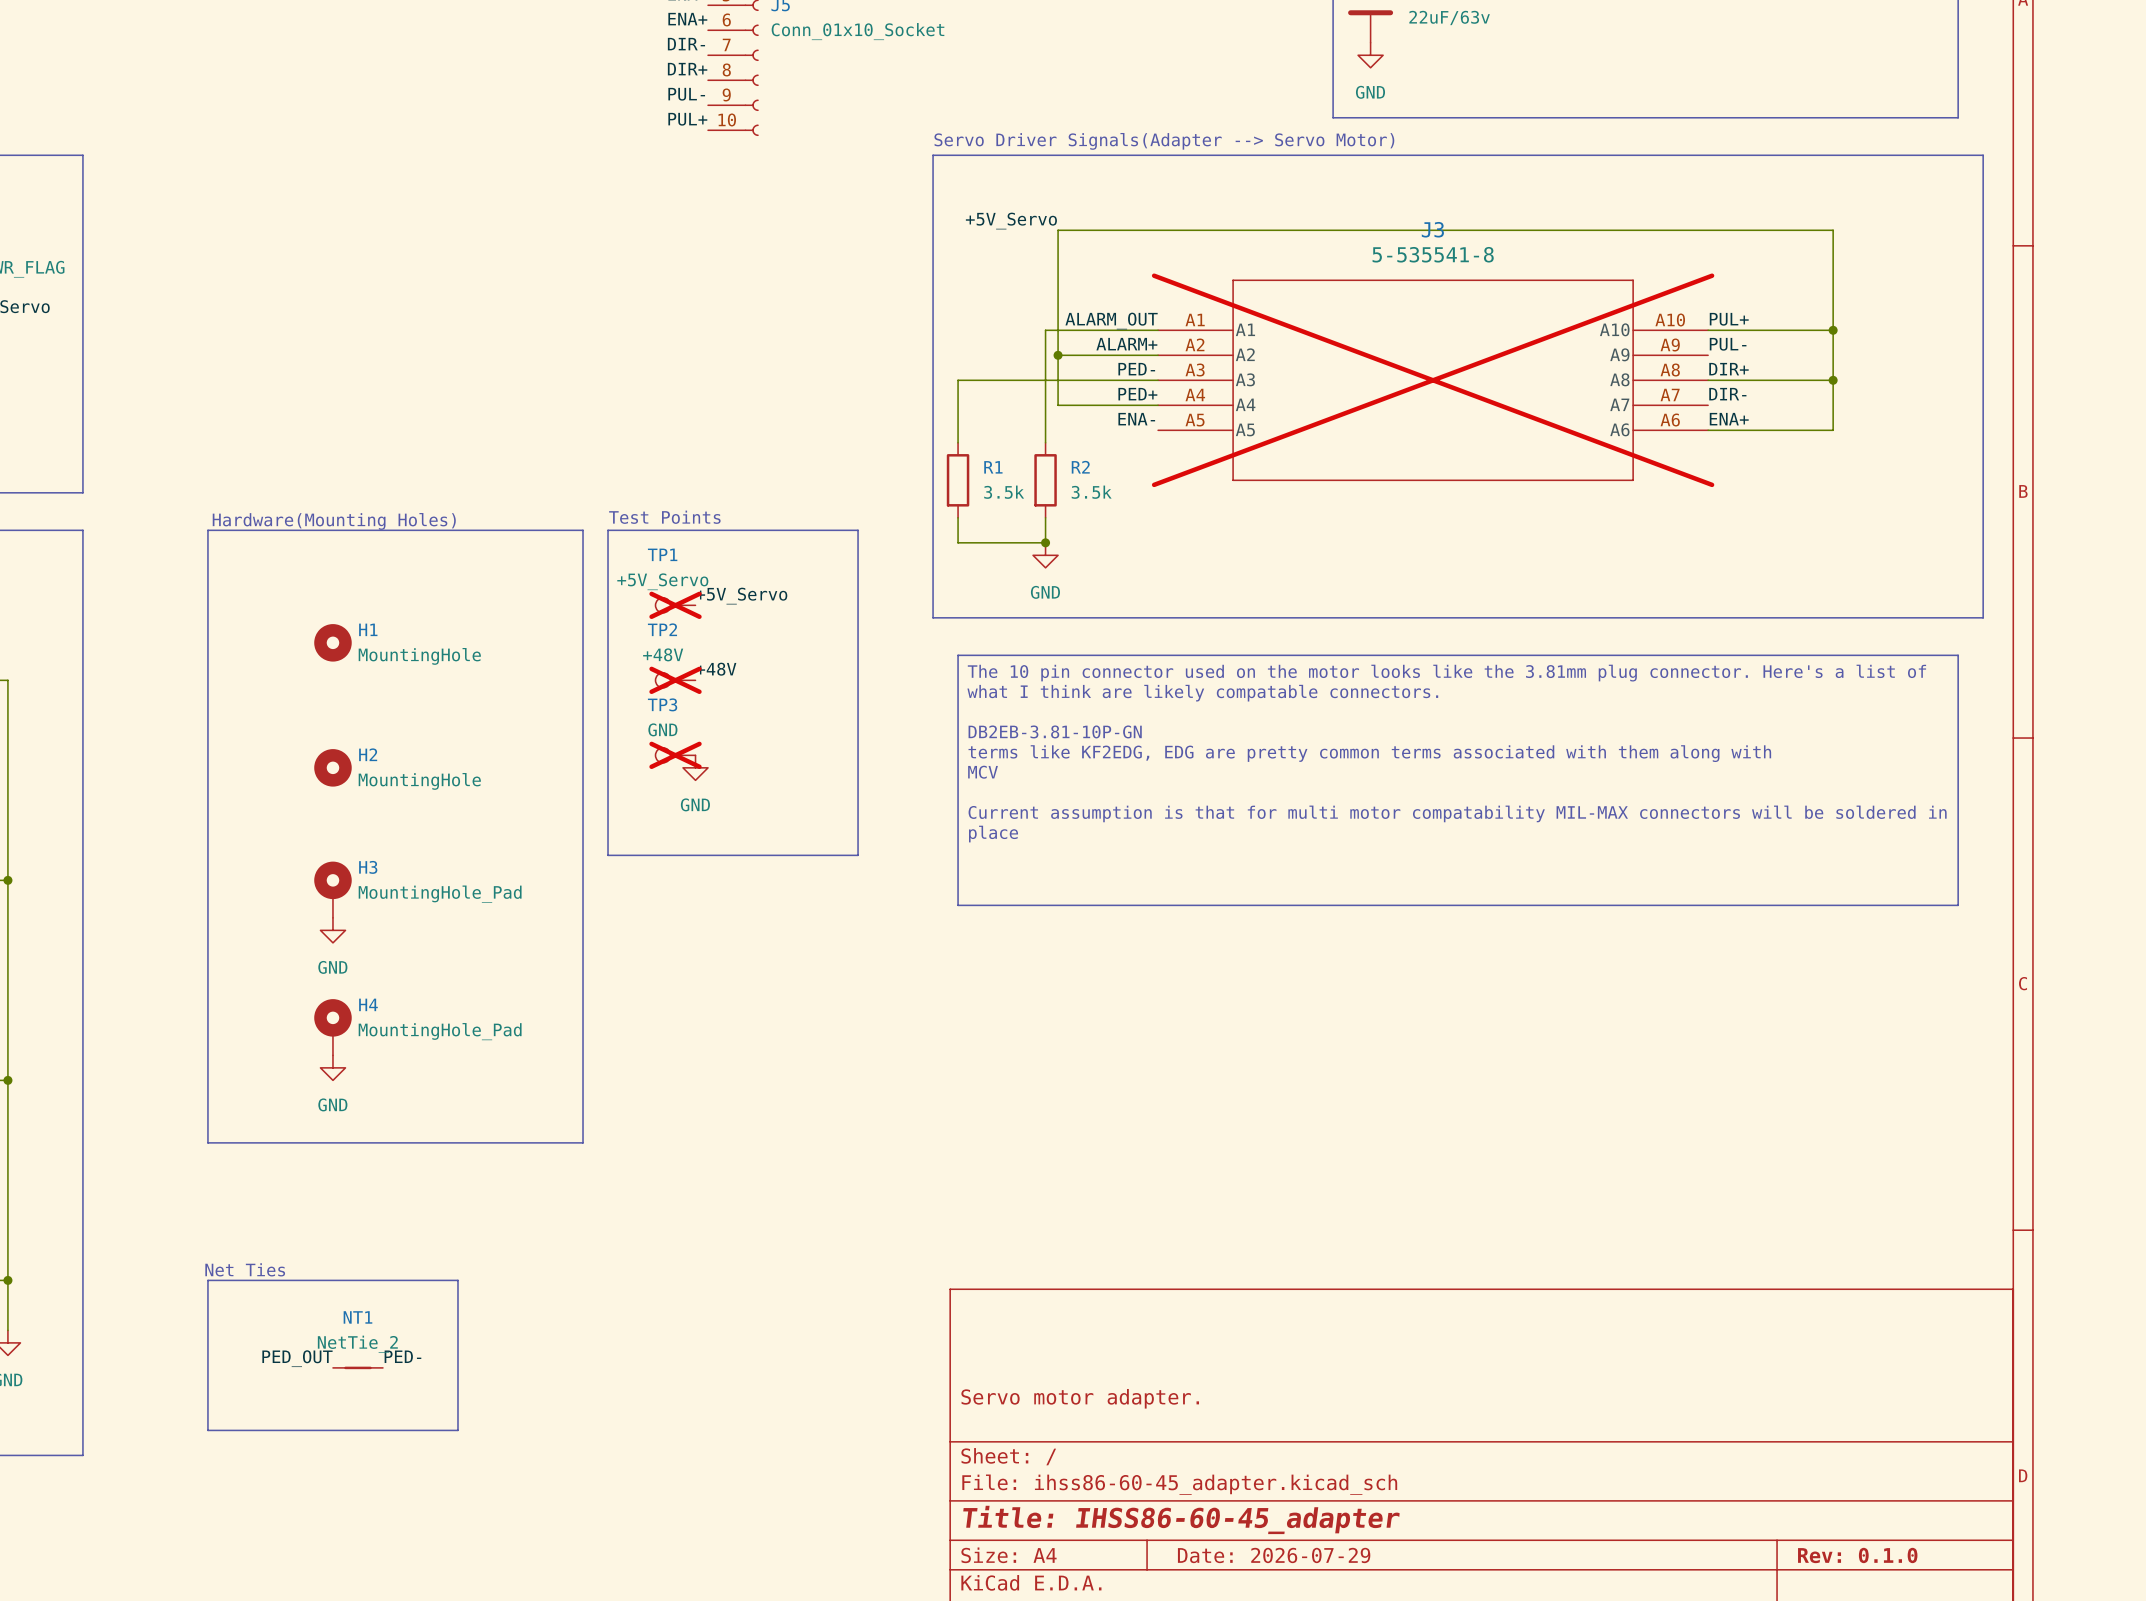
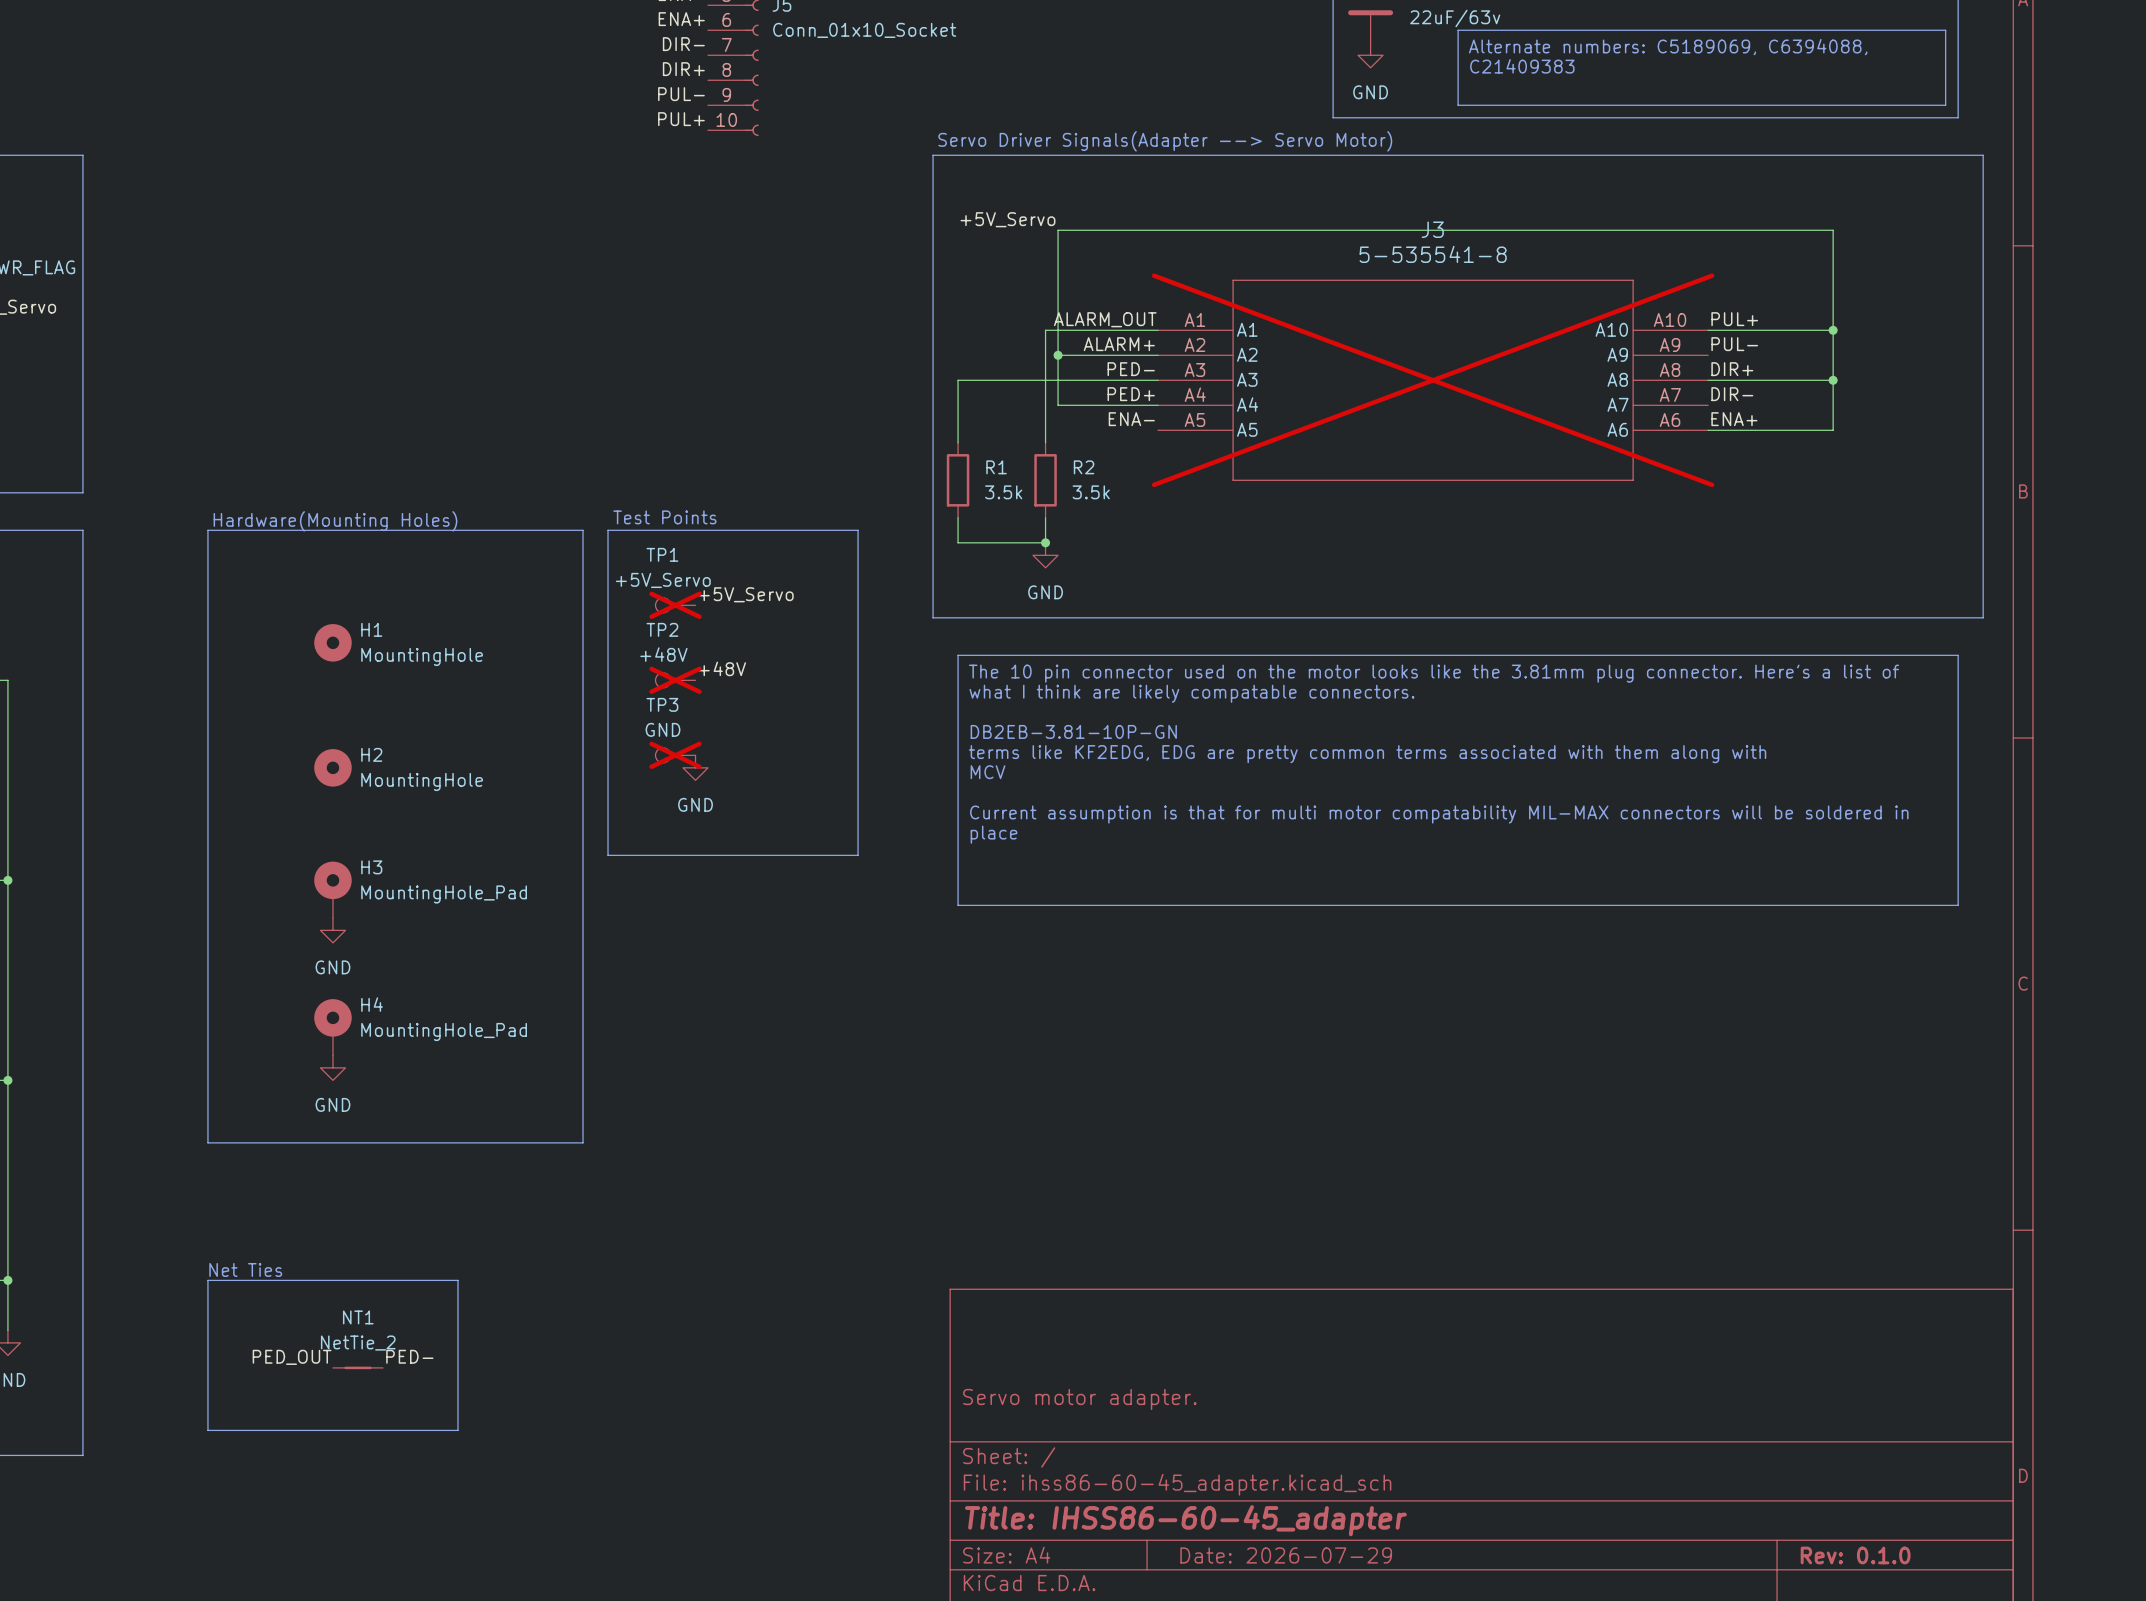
line: none -> (1458, 30) (1945, 30) (1945, 105) (1458, 105) (1458, 30)
text: none -> Alternate numbers: C5189069, C6394088, (1668, 47)
text: none -> C21409383 (1522, 66)

